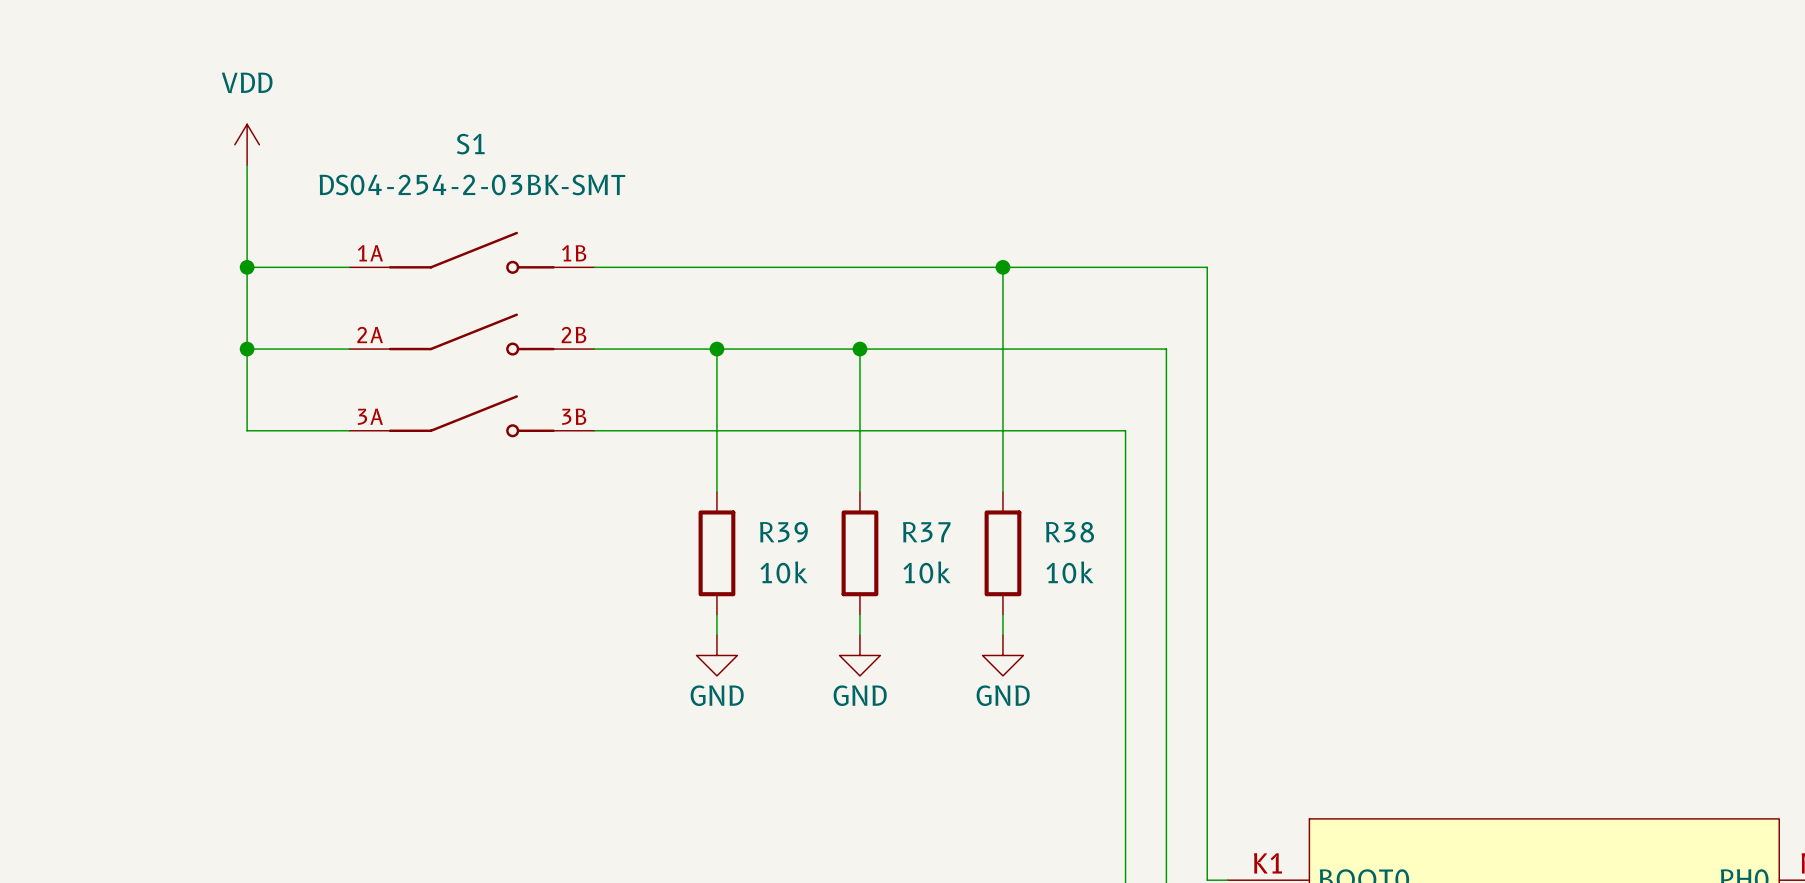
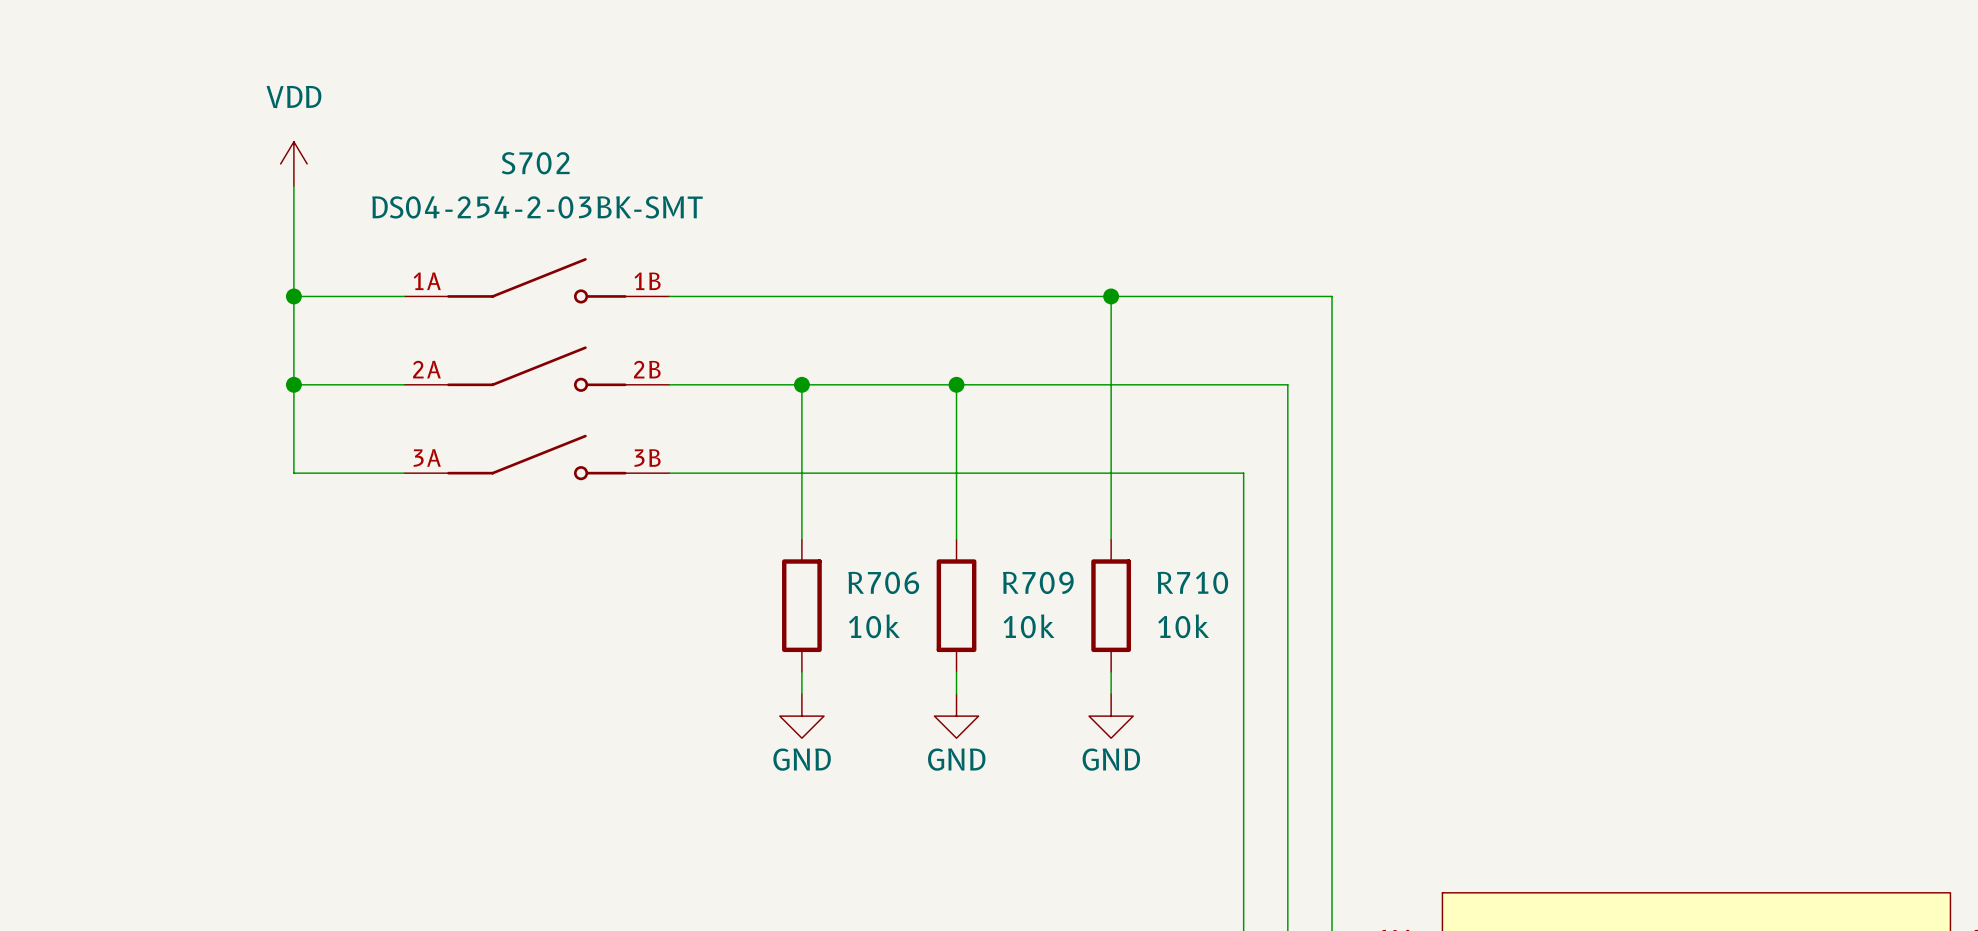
S1 name: S1 (470, 144) -> S702 (535, 163)
R39 name: R39 (783, 532) -> R706 (883, 582)
R37 name: R37 (926, 532) -> R709 (1038, 582)
R38 name: R38 (1069, 532) -> R710 (1192, 582)

